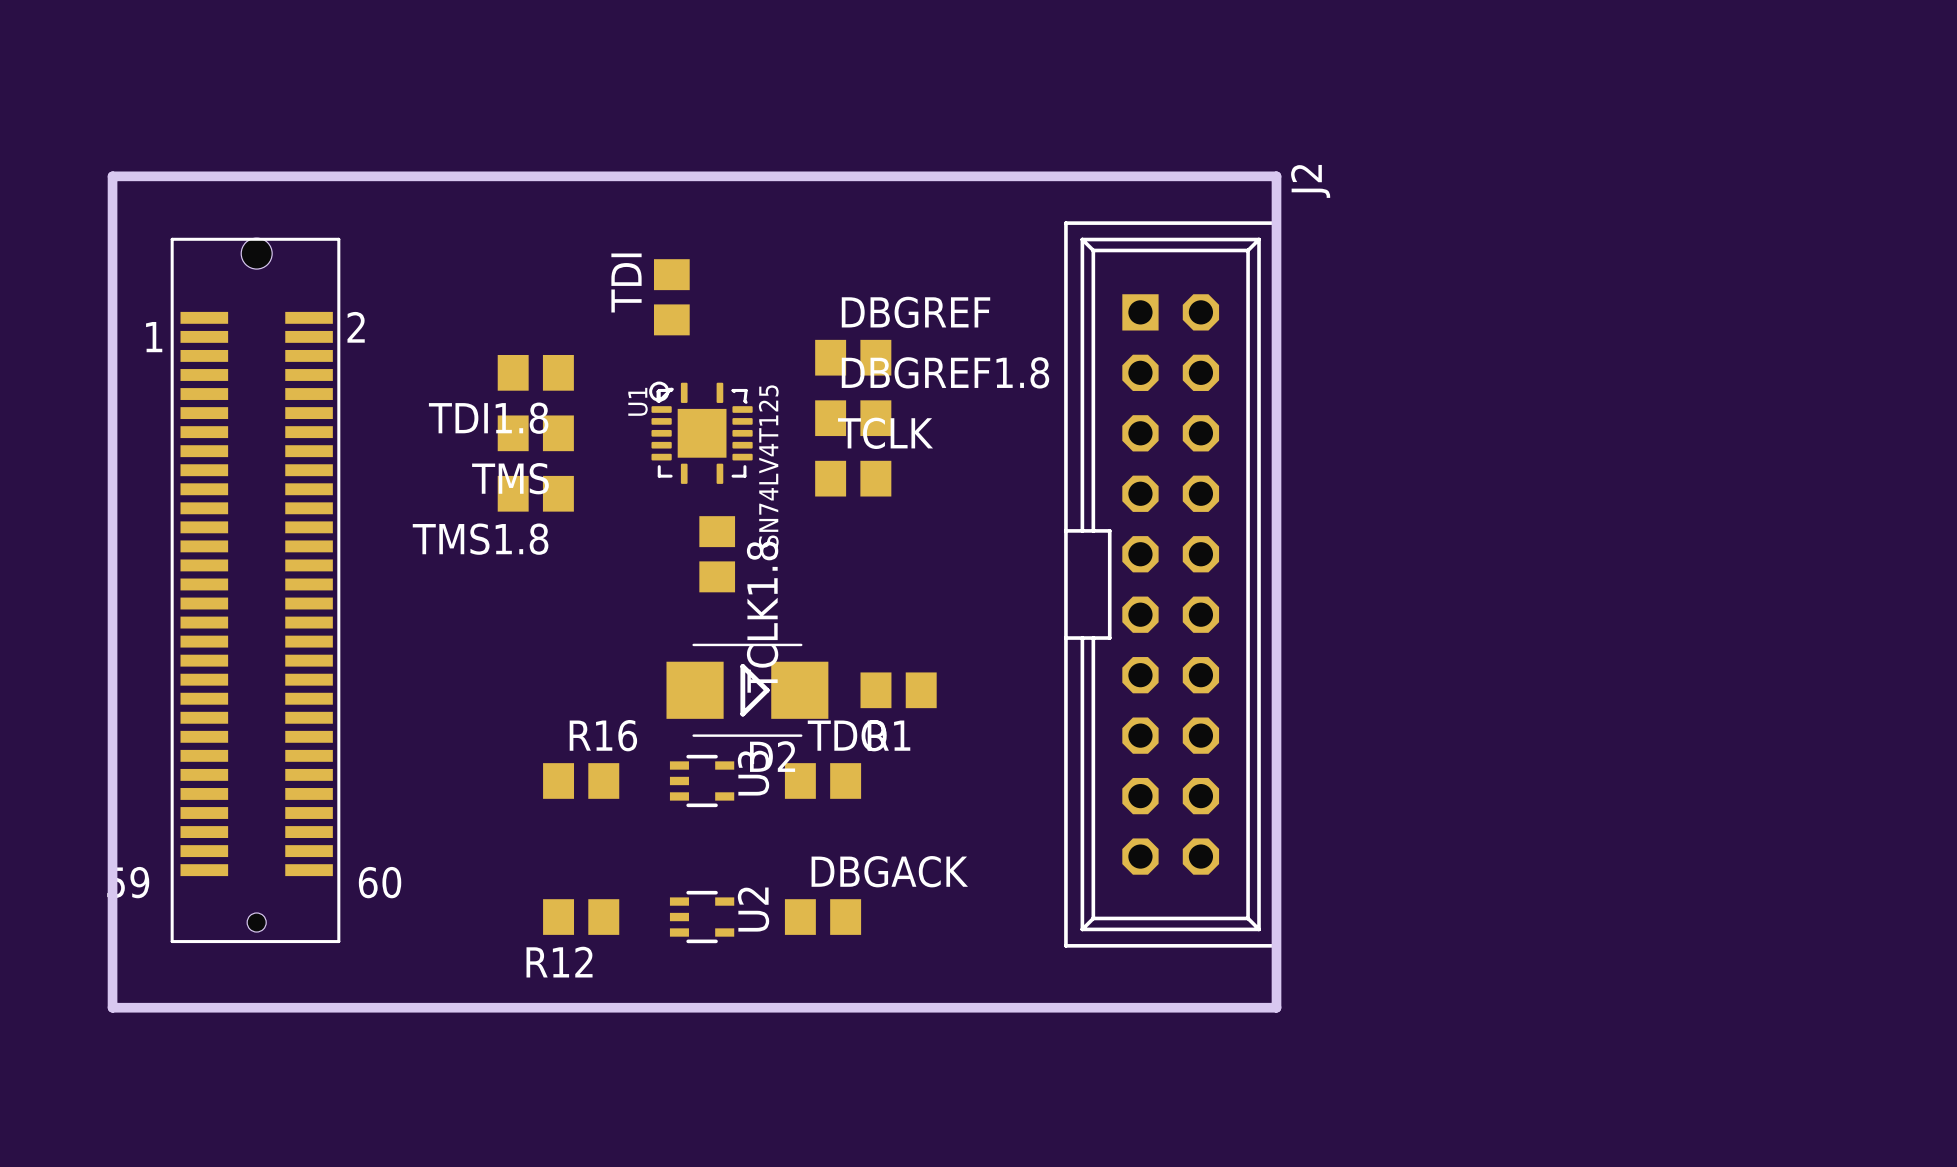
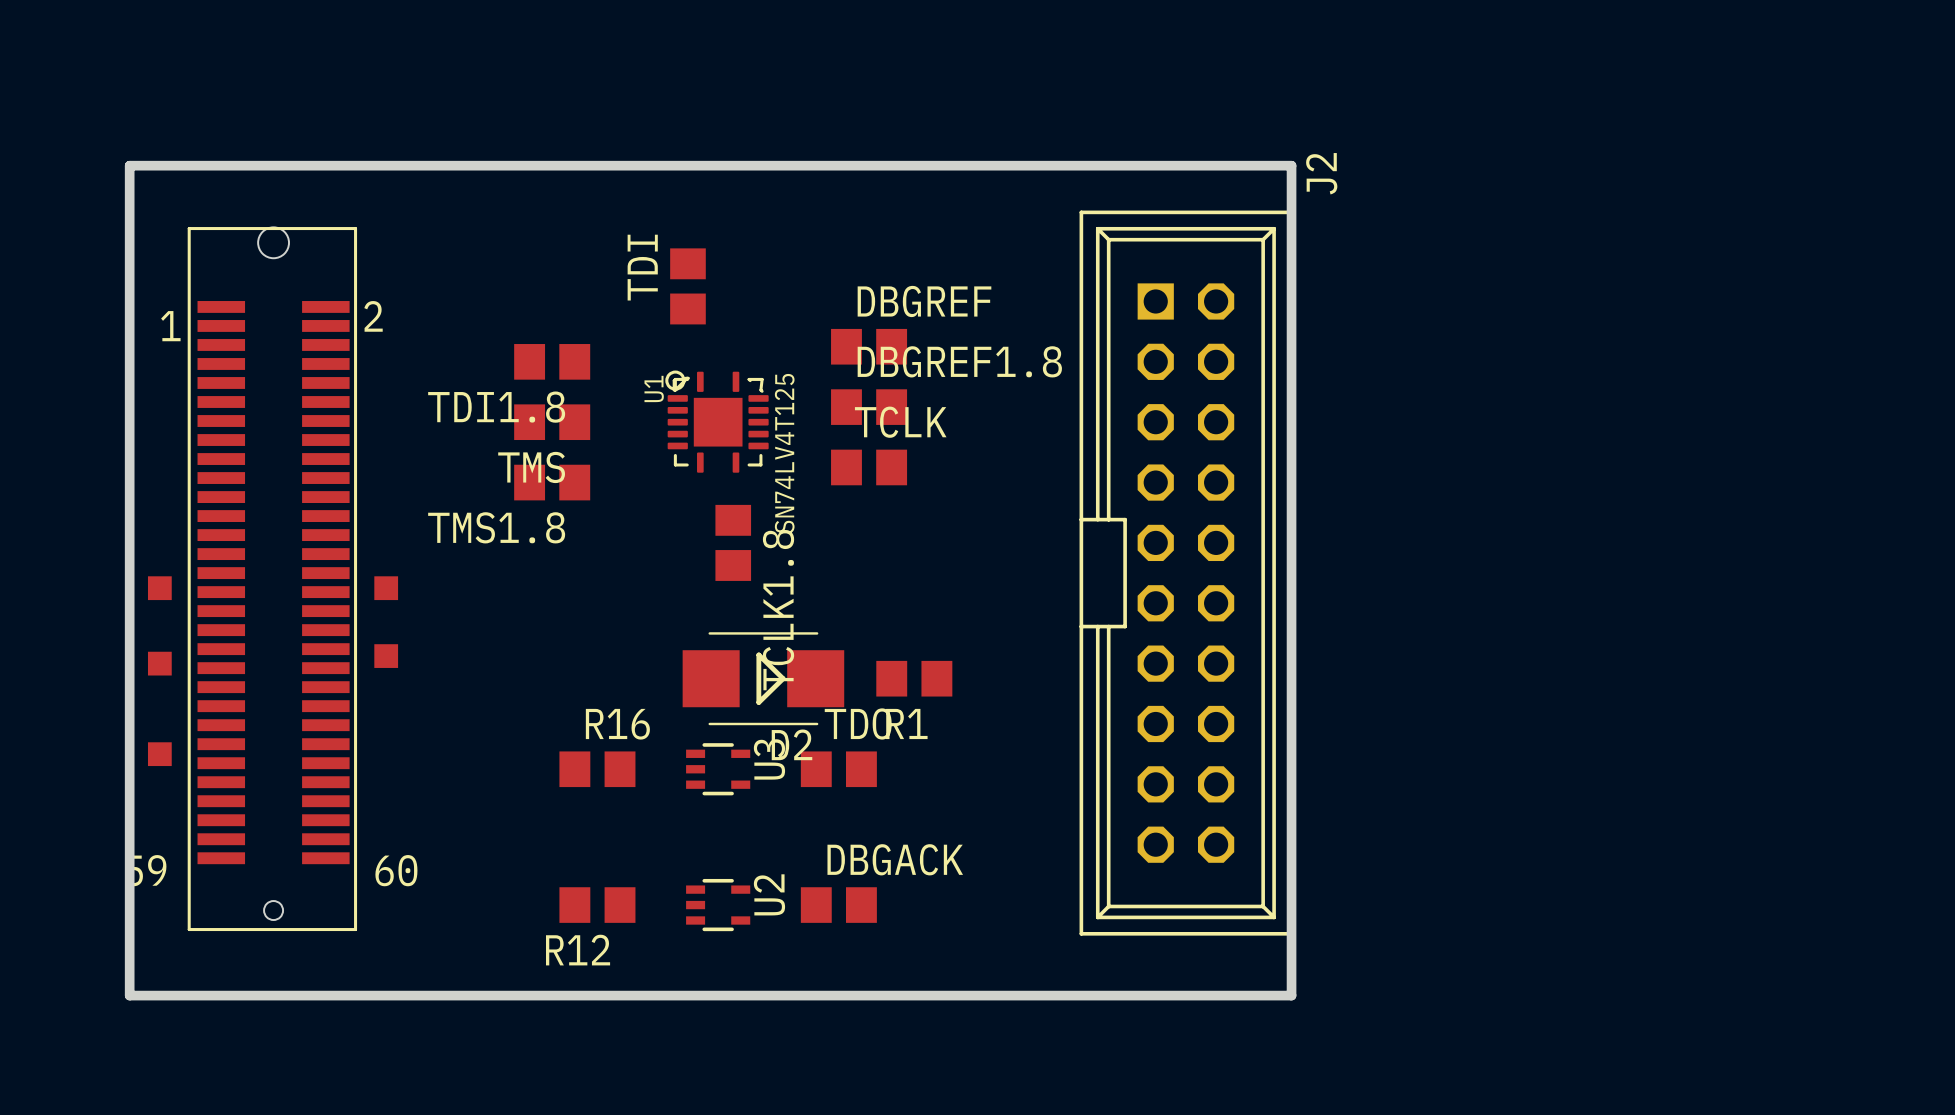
part: none -> (159, 588)
part: none -> (386, 588)
part: none -> (386, 656)
part: none -> (159, 663)
part: none -> (159, 754)

